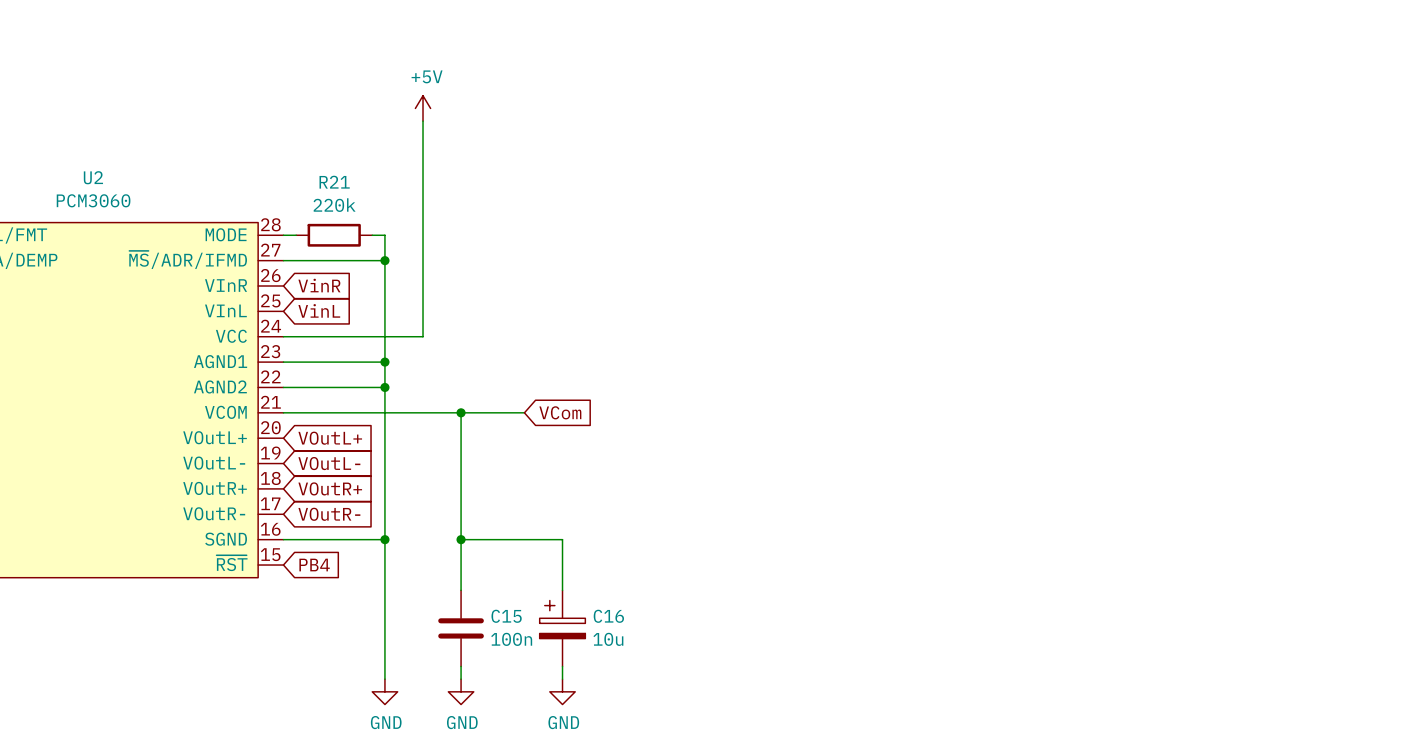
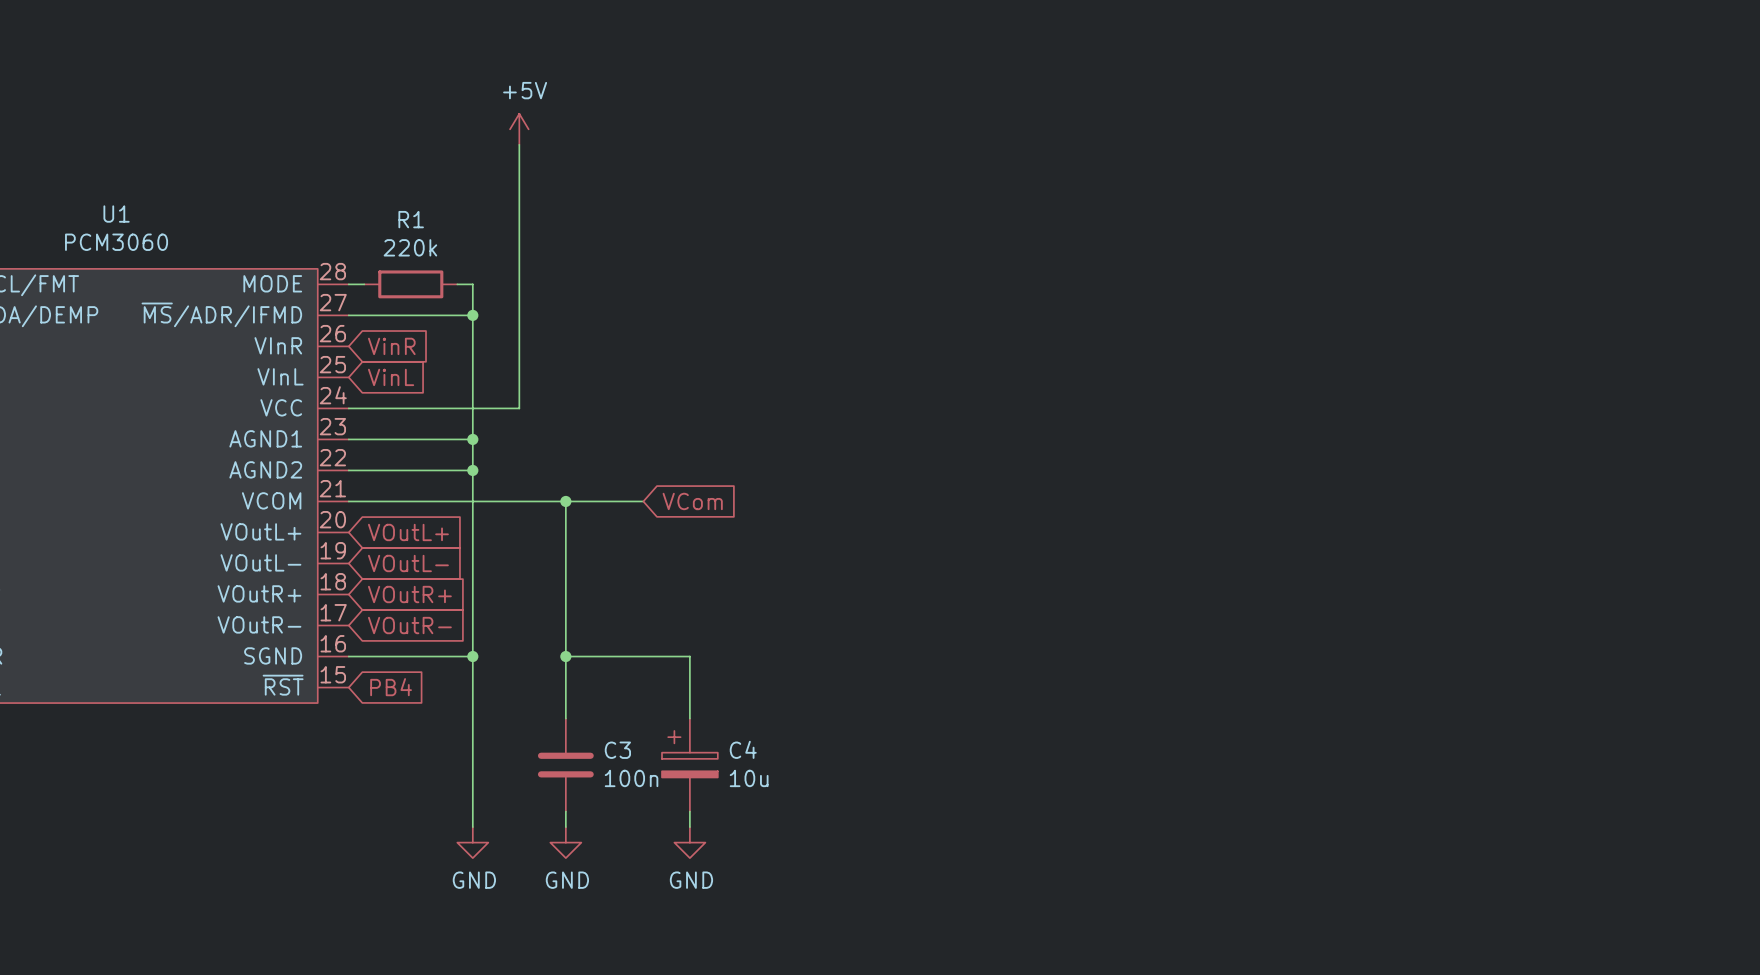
U2 name: U2 (93, 177) -> U1 (116, 214)
R21 name: R21 (334, 182) -> R1 (411, 219)
C15 name: C15 (506, 616) -> C3 (617, 750)
C16 name: C16 (608, 616) -> C4 (743, 749)

